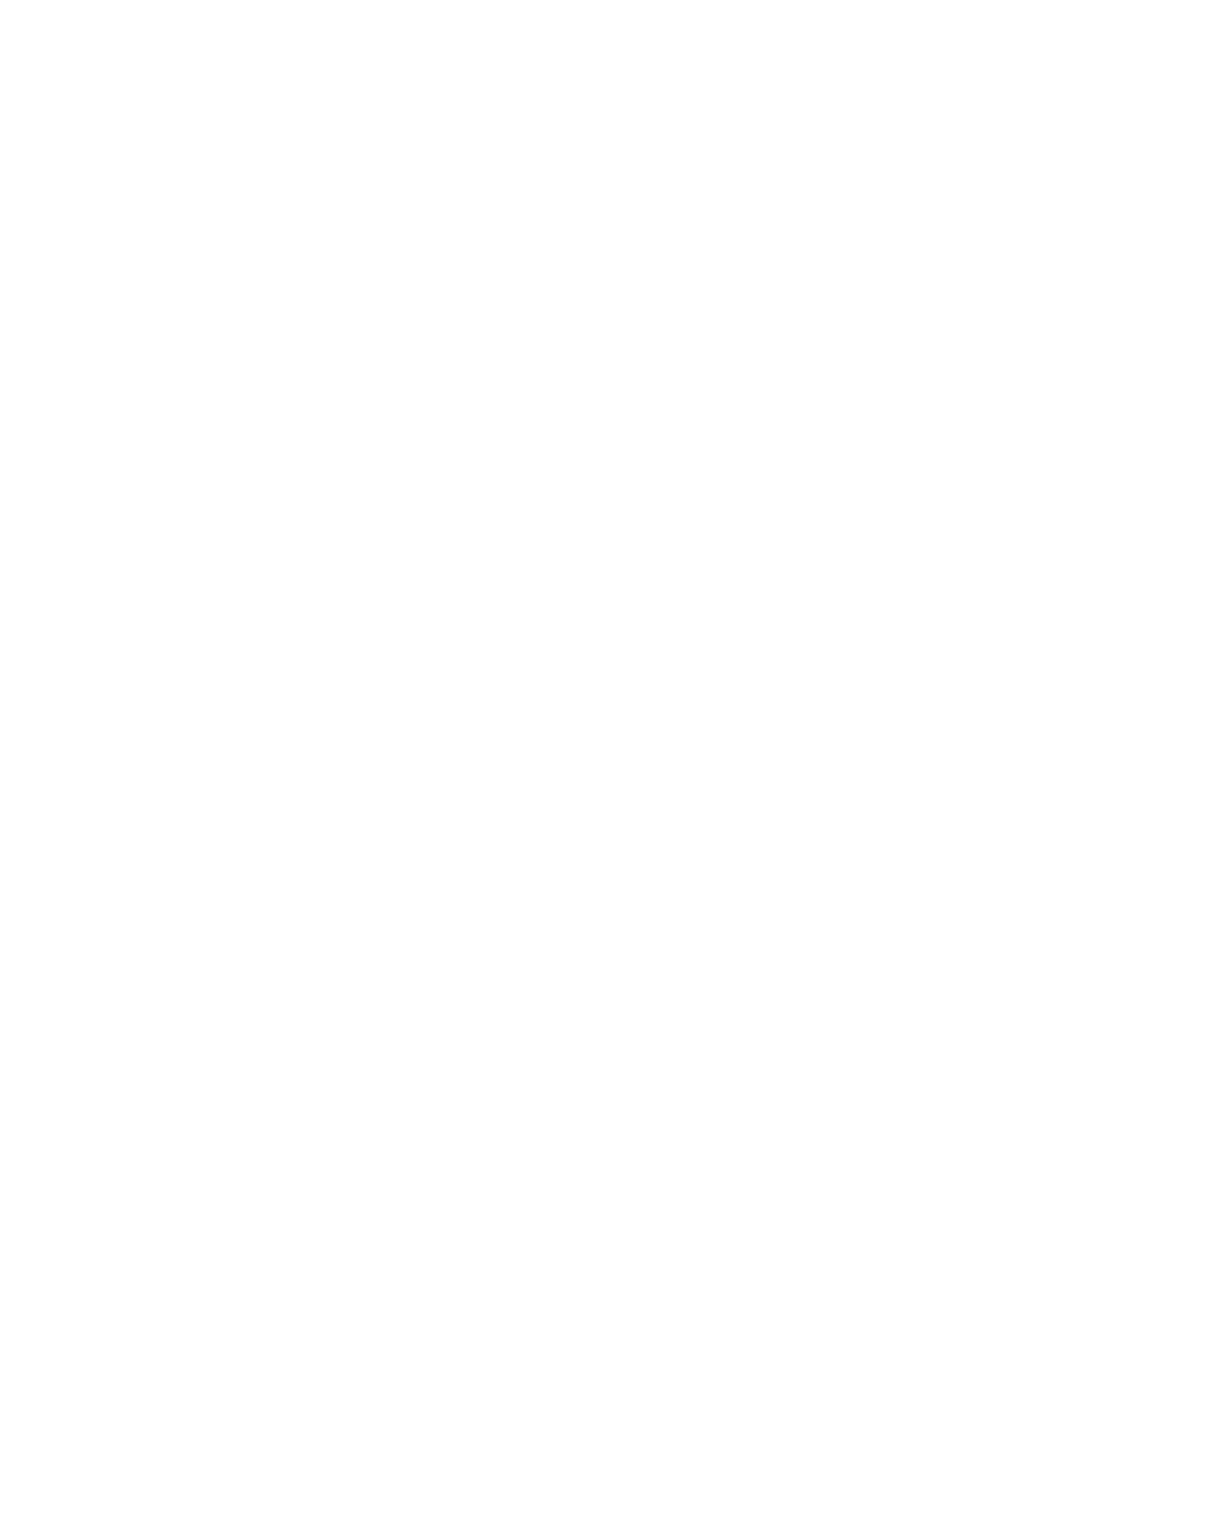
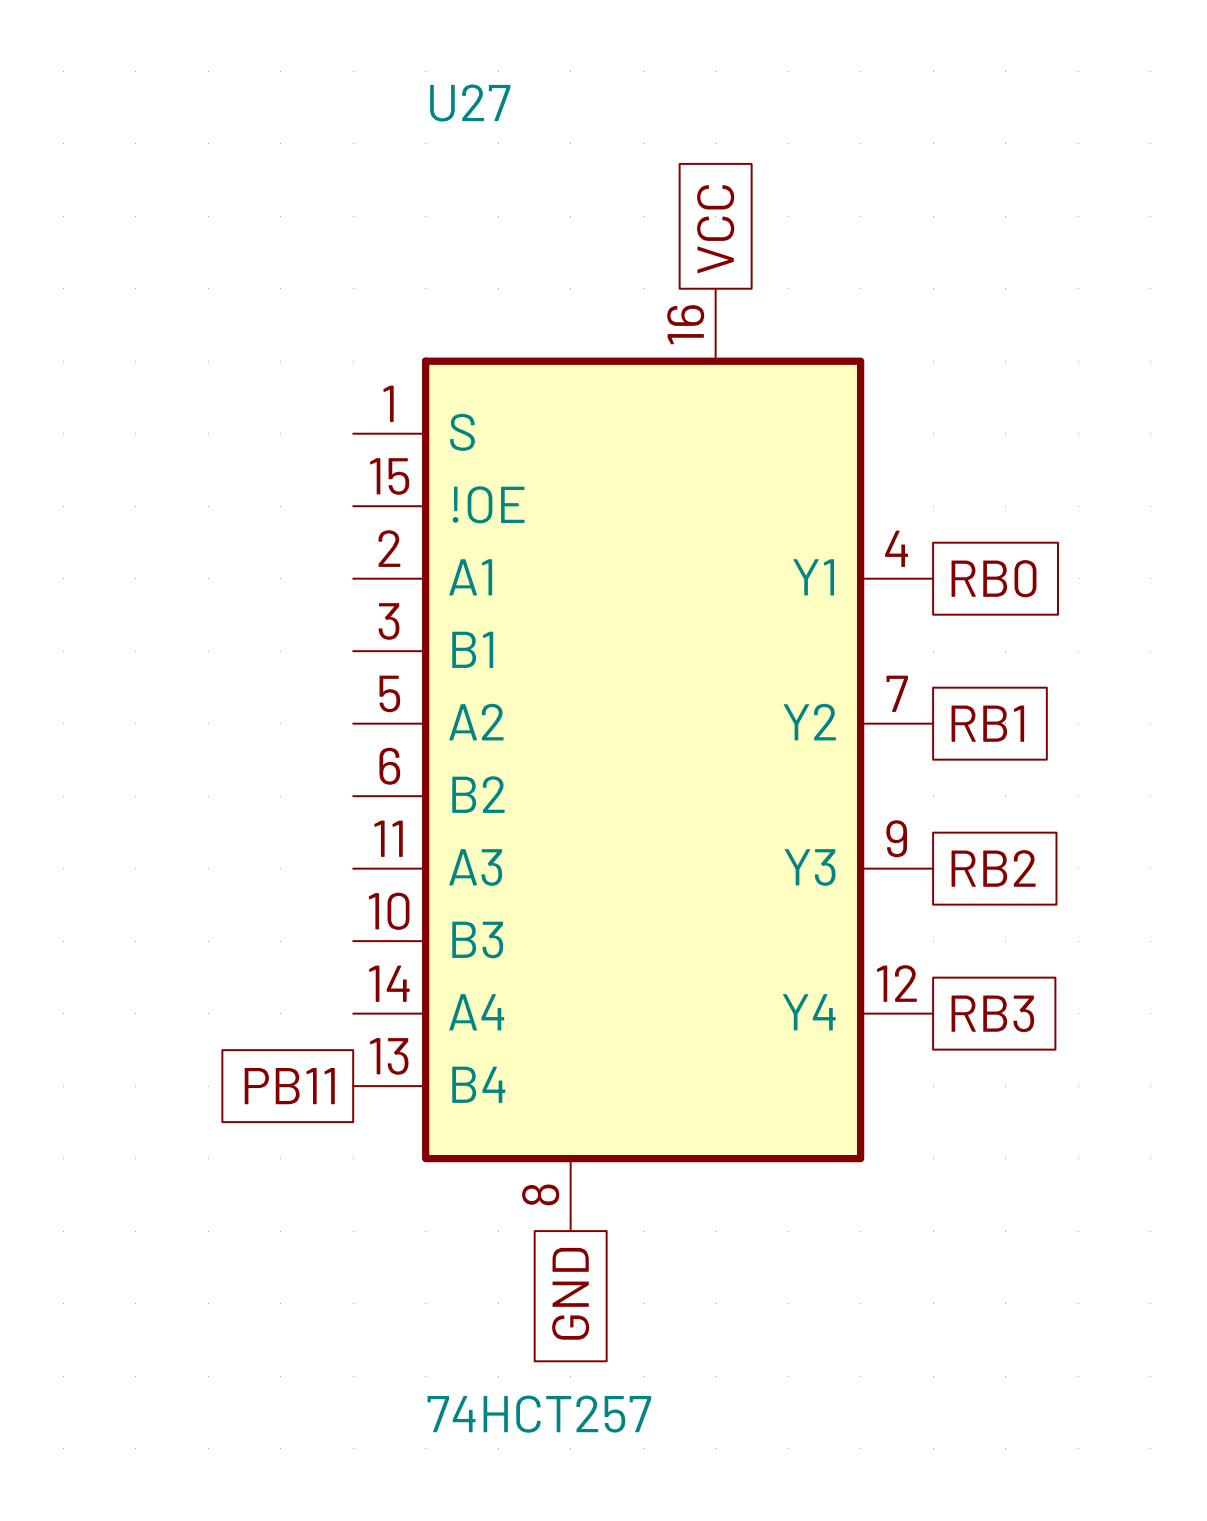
global label: none -> VCC (715, 229)
global label: none -> RB0 (994, 578)
global label: none -> RB1 (987, 723)
U27: none -> 74HCT257 (643, 759)
global label: none -> RB2 (993, 868)
global label: none -> RB3 (992, 1013)
global label: none -> PB11 (289, 1086)
global label: none -> GND (570, 1293)

